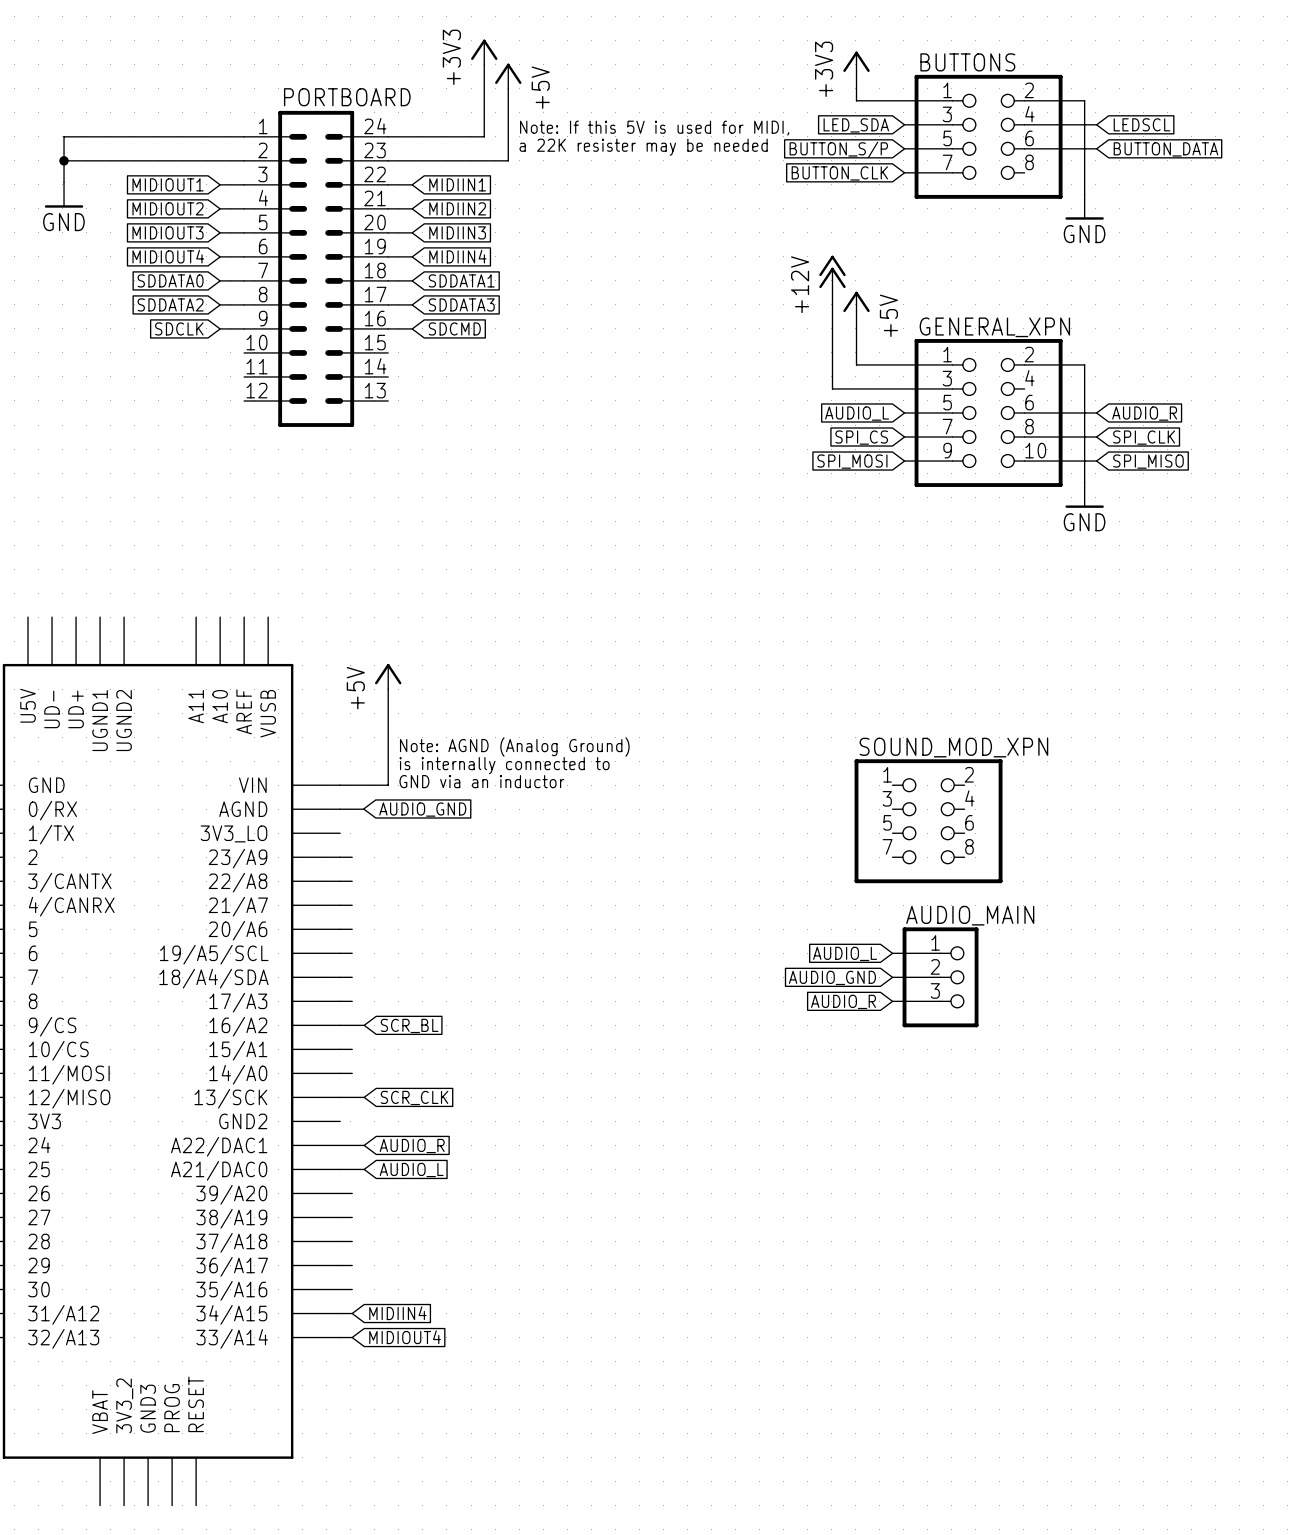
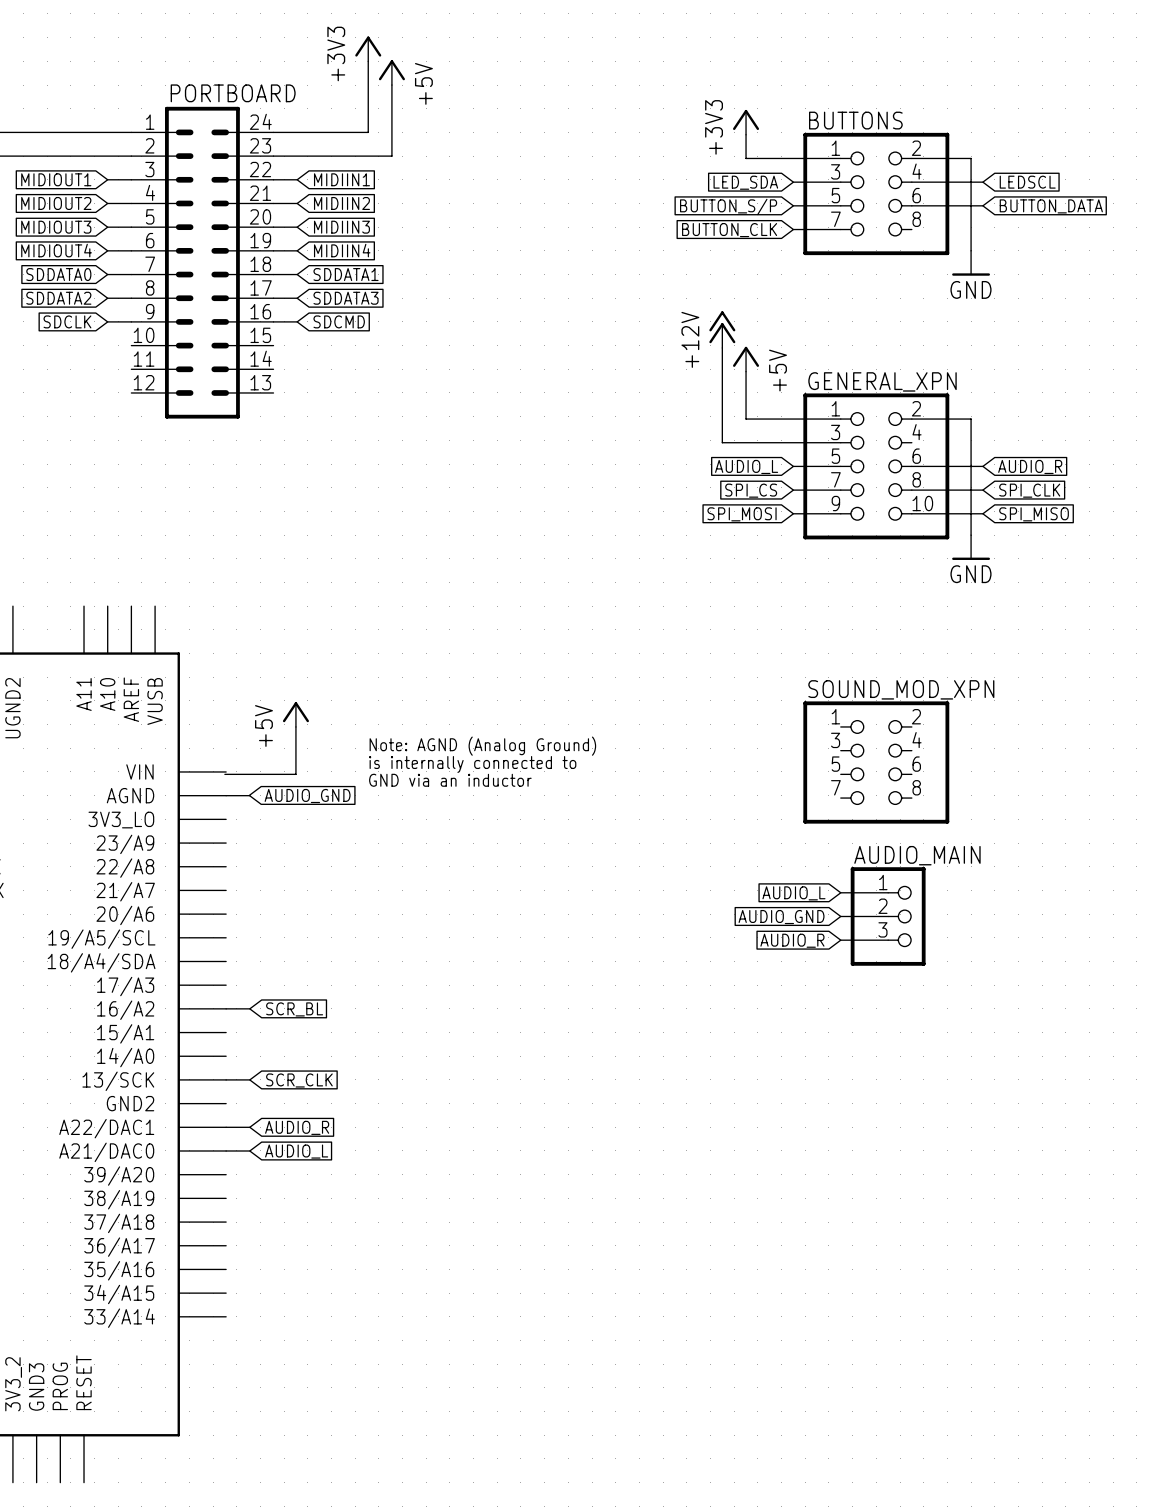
power symbol position: +3V3 (856, 64) -> +3V3 (746, 122)
wire: (856, 76) (856, 100) (952, 100) -> (746, 134) (746, 158) (840, 158)
wire: (1024, 100) (1084, 100) (1084, 194) -> (911, 158) (971, 158) (971, 250)
wire: (904, 124) (952, 124) -> (793, 182) (840, 182)
wire: (1024, 124) (1096, 124) -> (911, 182) (982, 182)
global label position: LEDSCL (1142, 124) -> LEDSCL (1027, 182)
global label position: LED_SDA (856, 125) -> LED_SDA (745, 182)
text: Note: If this 5V is used for MIDI, (654, 128) -> none
BUTTONS position: (988, 136) -> (876, 193)
text: a 22K resister may be needed (643, 147) -> none
wire: (904, 148) (952, 148) -> (793, 205) (840, 205)
wire: (1024, 148) (1096, 148) -> (911, 205) (982, 205)
global label position: BUTTON_S/P (838, 149) -> BUTTON_S/P (728, 206)
global label position: BUTTON_DATA (1165, 149) -> BUTTON_DATA (1051, 206)
wire: (904, 172) (952, 172) -> (793, 229) (840, 229)
global label position: BUTTON_CLK (839, 173) -> BUTTON_CLK (729, 230)
power symbol position: GND (1084, 207) -> GND (971, 263)
power symbol position: +12V (832, 274) -> +12V (722, 329)
wire: (832, 292) (832, 388) (952, 388) -> (722, 347) (722, 442) (840, 442)
power symbol position: +5V (856, 304) -> +5V (746, 359)
wire: (856, 316) (856, 364) (952, 364) -> (746, 371) (746, 419) (840, 419)
wire: (1024, 364) (1084, 364) (1084, 482) -> (911, 419) (971, 419) (971, 535)
wire: (904, 412) (952, 412) -> (793, 466) (840, 466)
GENERAL_XPN position: (988, 412) -> (876, 466)
wire: (1024, 412) (1096, 412) -> (911, 466) (982, 466)
global label position: AUDIO_L (857, 413) -> AUDIO_L (746, 466)
global label position: AUDIO_R (1144, 413) -> AUDIO_R (1030, 466)
global label position: SPI_CS (861, 437) -> SPI_CS (751, 490)
wire: (904, 437) (952, 437) -> (793, 490) (840, 490)
wire: (1024, 437) (1096, 437) -> (911, 490) (982, 490)
global label position: SPI_CLK (1144, 437) -> SPI_CLK (1029, 490)
global label position: SPI_MOSI (852, 461) -> SPI_MOSI (742, 514)
wire: (904, 461) (952, 461) -> (793, 513) (840, 513)
wire: (1024, 461) (1096, 461) -> (911, 513) (982, 513)
global label position: SPI_MISO (1148, 461) -> SPI_MISO (1034, 514)
power symbol position: GND (1084, 495) -> GND (971, 547)
power symbol position: +5V (388, 676) -> +5V (295, 714)
wire: (388, 689) (388, 785) (340, 785) -> none
wire: none -> (295, 726) (295, 774) (224, 774)
text position: Note: AGND (Analog Ground) (514, 747) -> Note: AGND (Analog Ground) (482, 746)
text position: is internally connected to (504, 765) -> is internally connected to (472, 764)
text position: GND via an inductor (481, 781) -> GND via an inductor (450, 780)
SOUND_MOD_XPN position: (928, 821) -> (876, 762)
wire: (340, 857) (352, 857) -> none
wire: (340, 881) (352, 881) -> none
wire: (340, 905) (352, 905) -> none
wire: (340, 929) (352, 929) -> none
wire: (340, 953) (352, 953) -> none
global label position: AUDIO_L (845, 953) -> AUDIO_L (793, 893)
wire: (892, 953) (940, 953) -> (840, 892) (888, 892)
wire: (340, 977) (352, 977) -> none
global label position: AUDIO_GND (832, 977) -> AUDIO_GND (781, 917)
wire: (892, 977) (940, 977) -> (840, 916) (888, 916)
AUDIO_MAIN position: (940, 977) -> (888, 916)
wire: (340, 1001) (352, 1001) -> none
global label position: AUDIO_R (843, 1001) -> AUDIO_R (792, 940)
wire: (892, 1001) (940, 1001) -> (840, 940) (888, 940)
wire: (340, 1049) (352, 1049) -> none
wire: (340, 1073) (352, 1073) -> none
wire: (340, 1193) (352, 1193) -> none
wire: (340, 1217) (352, 1217) -> none
wire: (340, 1241) (352, 1241) -> none
wire: (340, 1265) (352, 1265) -> none
wire: (340, 1289) (352, 1289) -> none
wire: (340, 1313) (352, 1313) -> none
global label: MIDIIN4 (397, 1313) -> none
wire: (340, 1337) (352, 1337) -> none
global label: MIDIOUT4 (405, 1337) -> none

